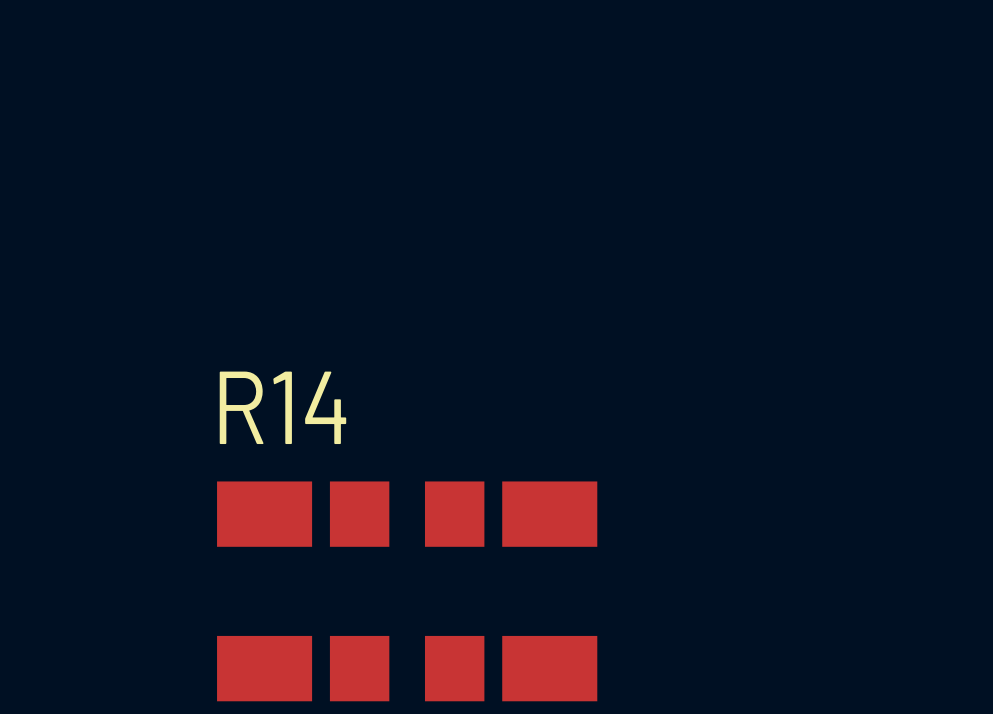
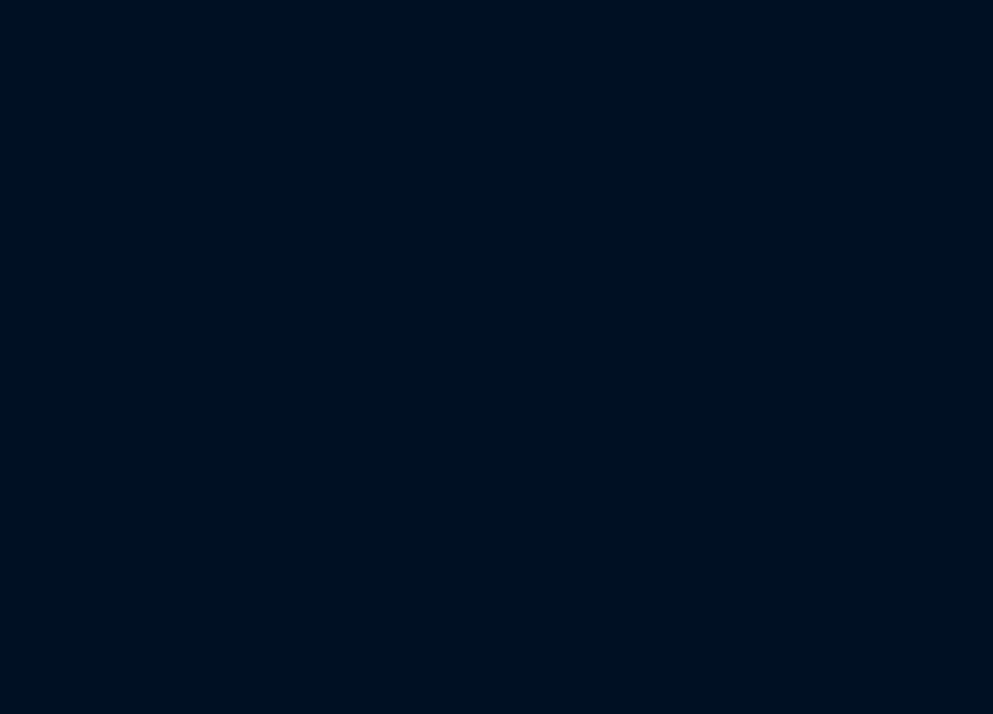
R14: (407, 591) -> none

